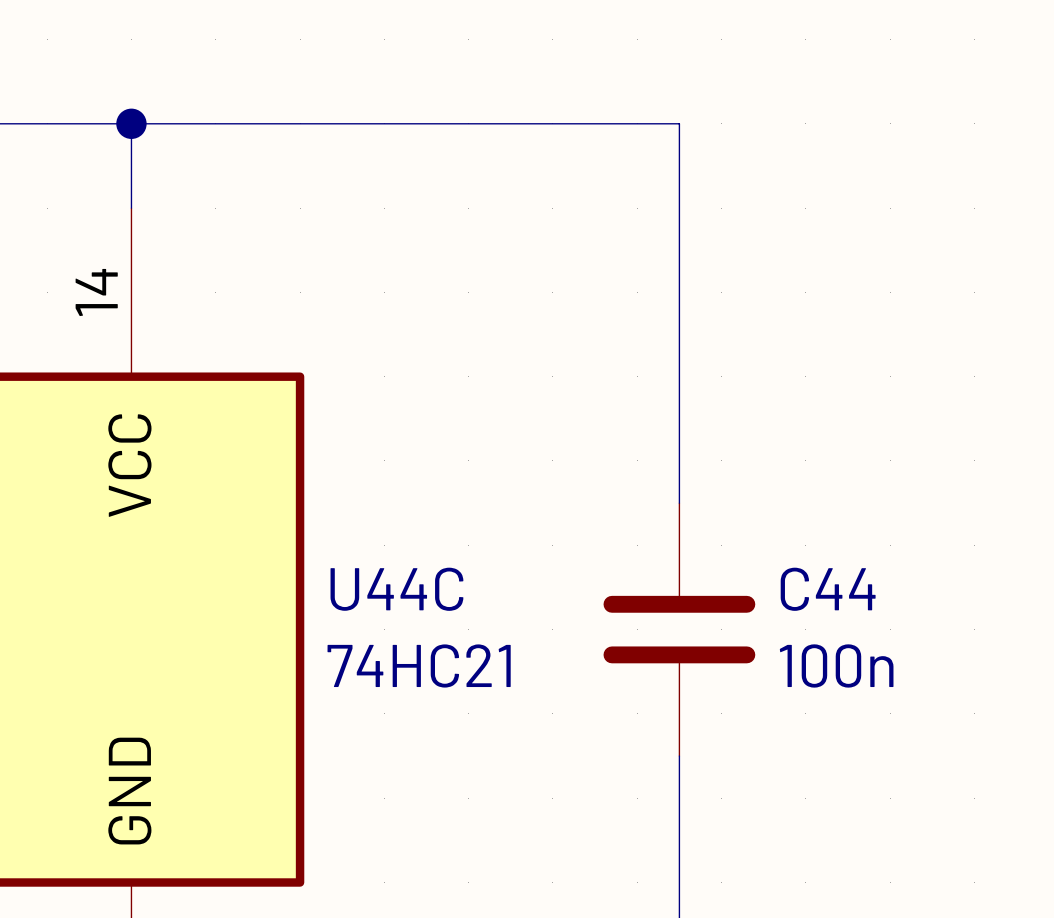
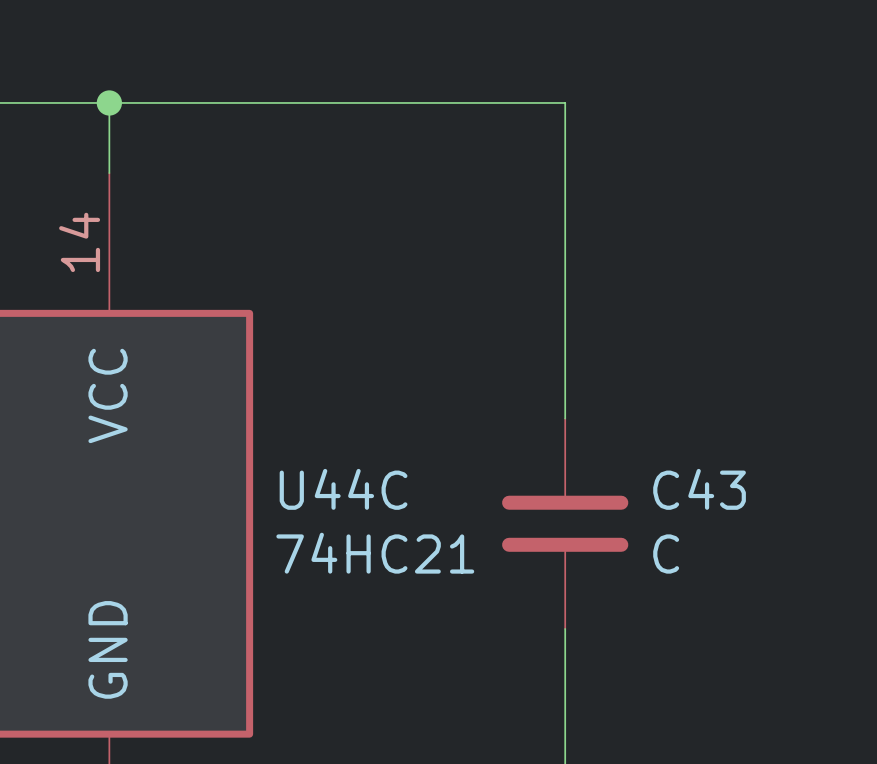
C44 name: C44 (828, 589) -> C43 (699, 489)
C44 value: 100n (836, 665) -> C (666, 554)

